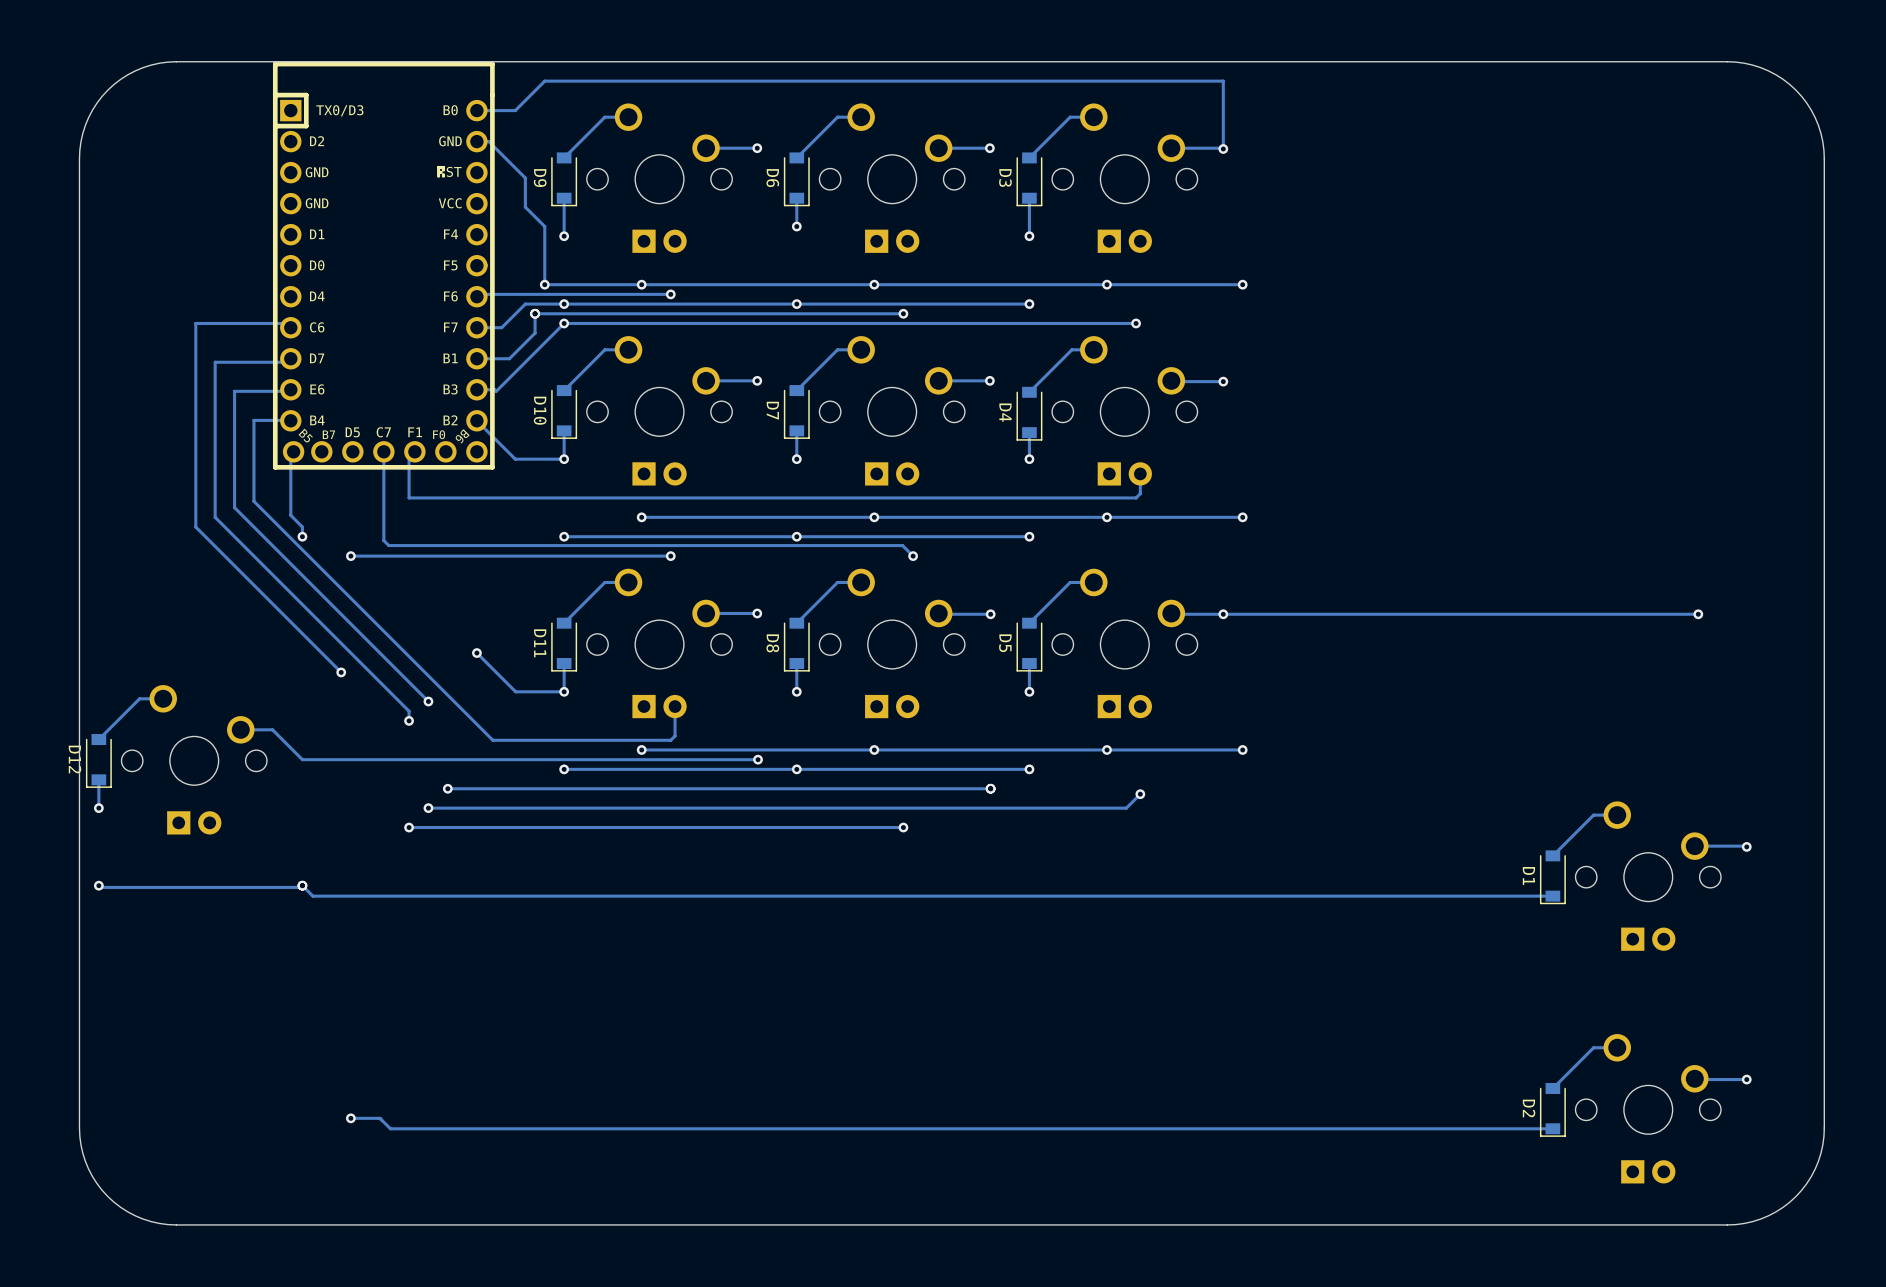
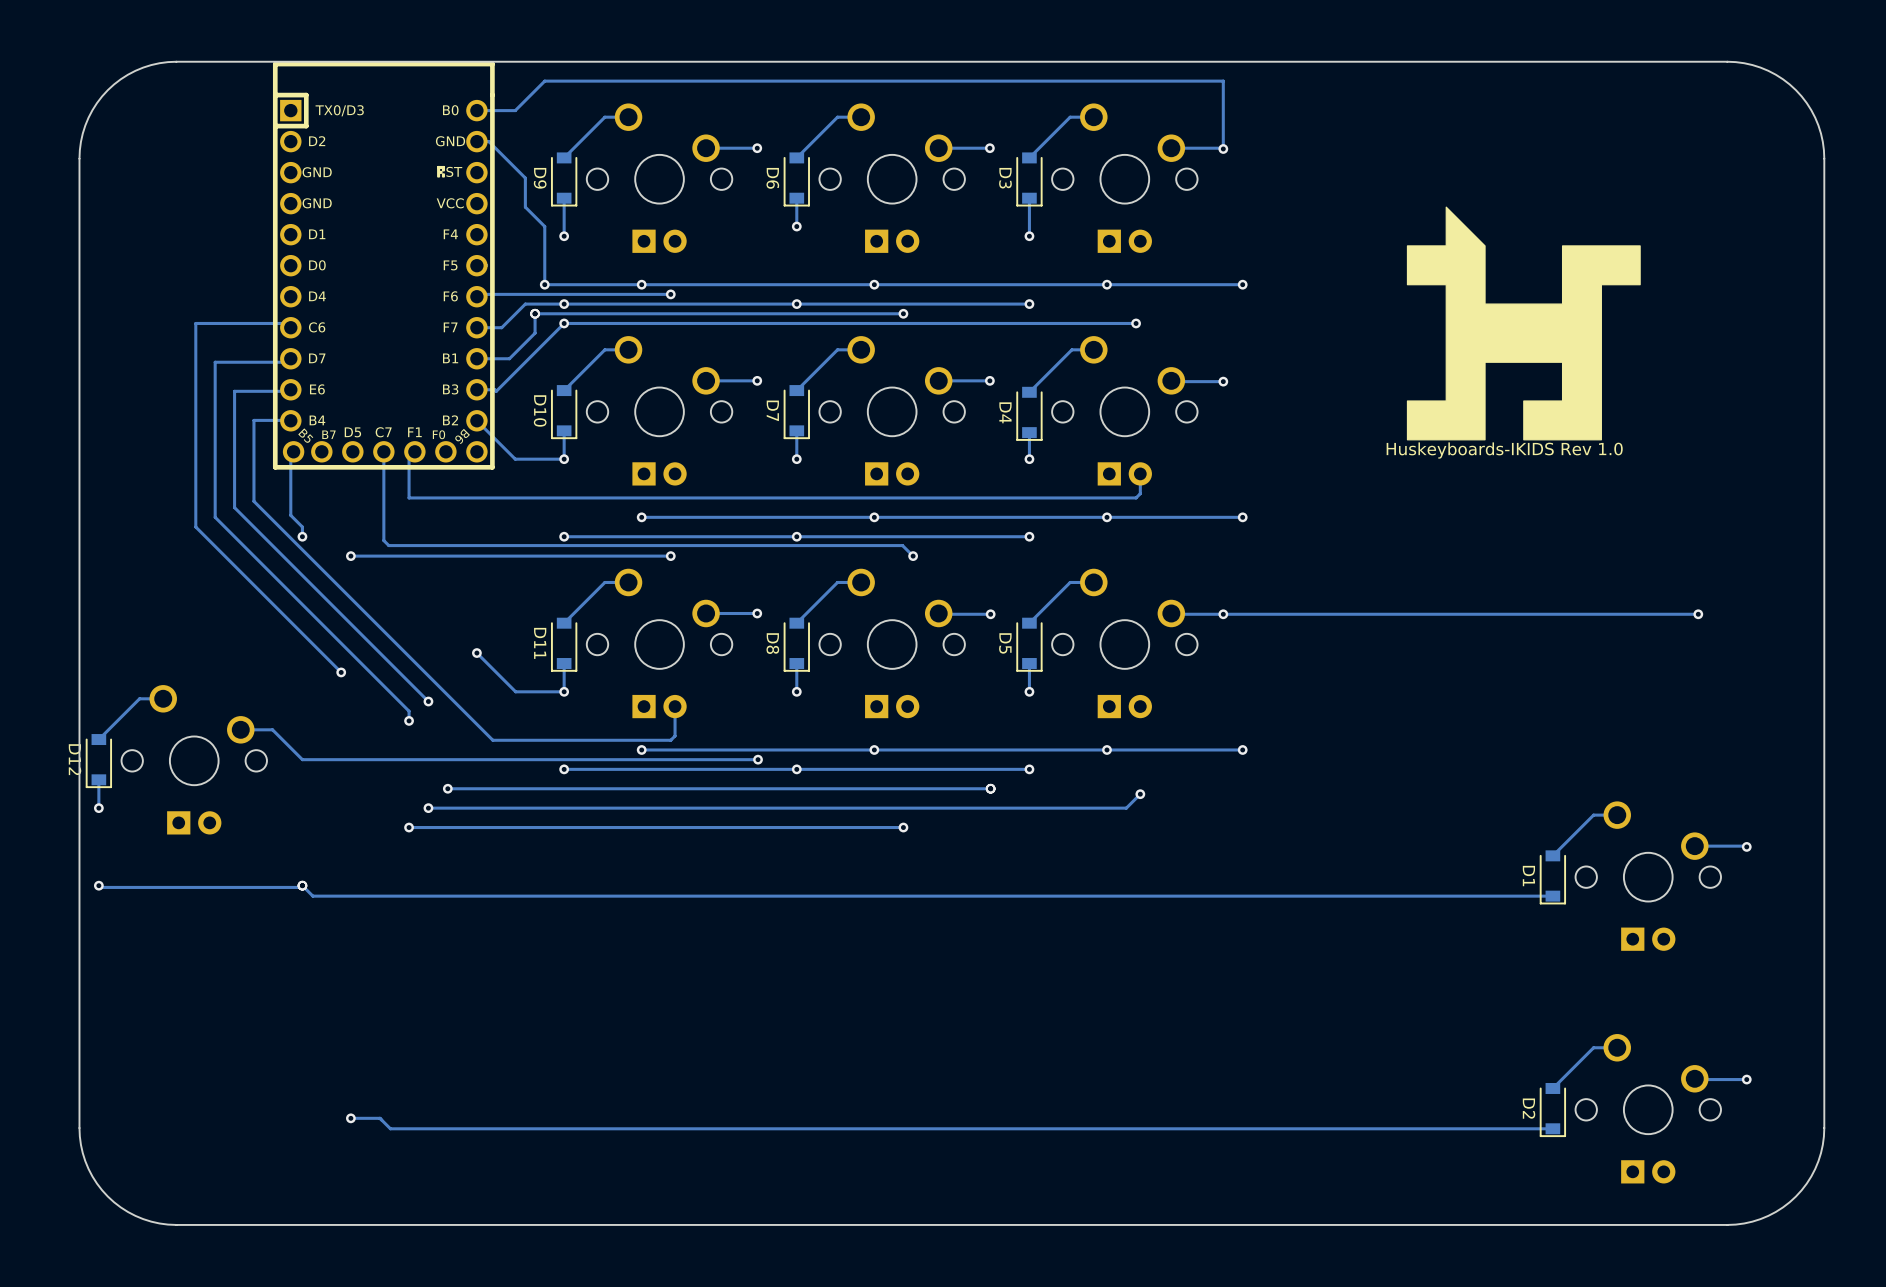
drawing: none -> [1406, 206, 1641, 441]
text: none -> Huskeyboards-IKIDS Rev 1.0 (1504, 450)

